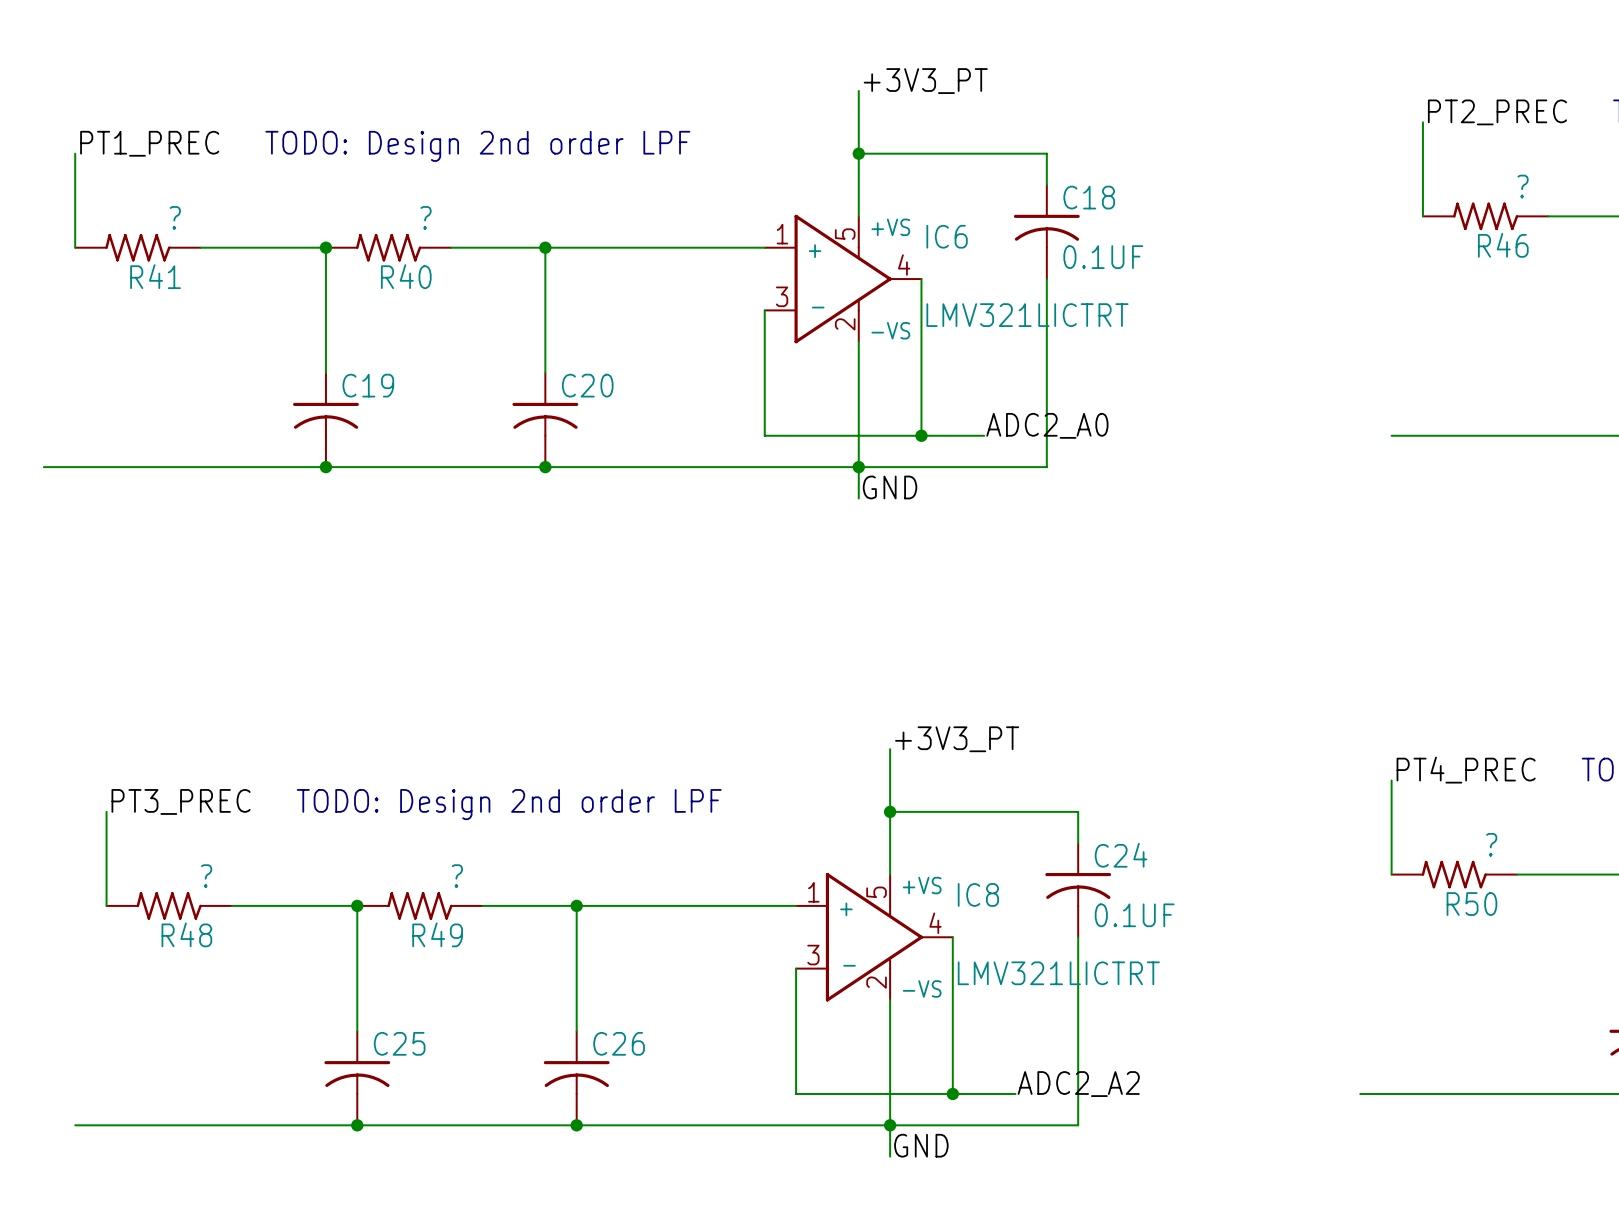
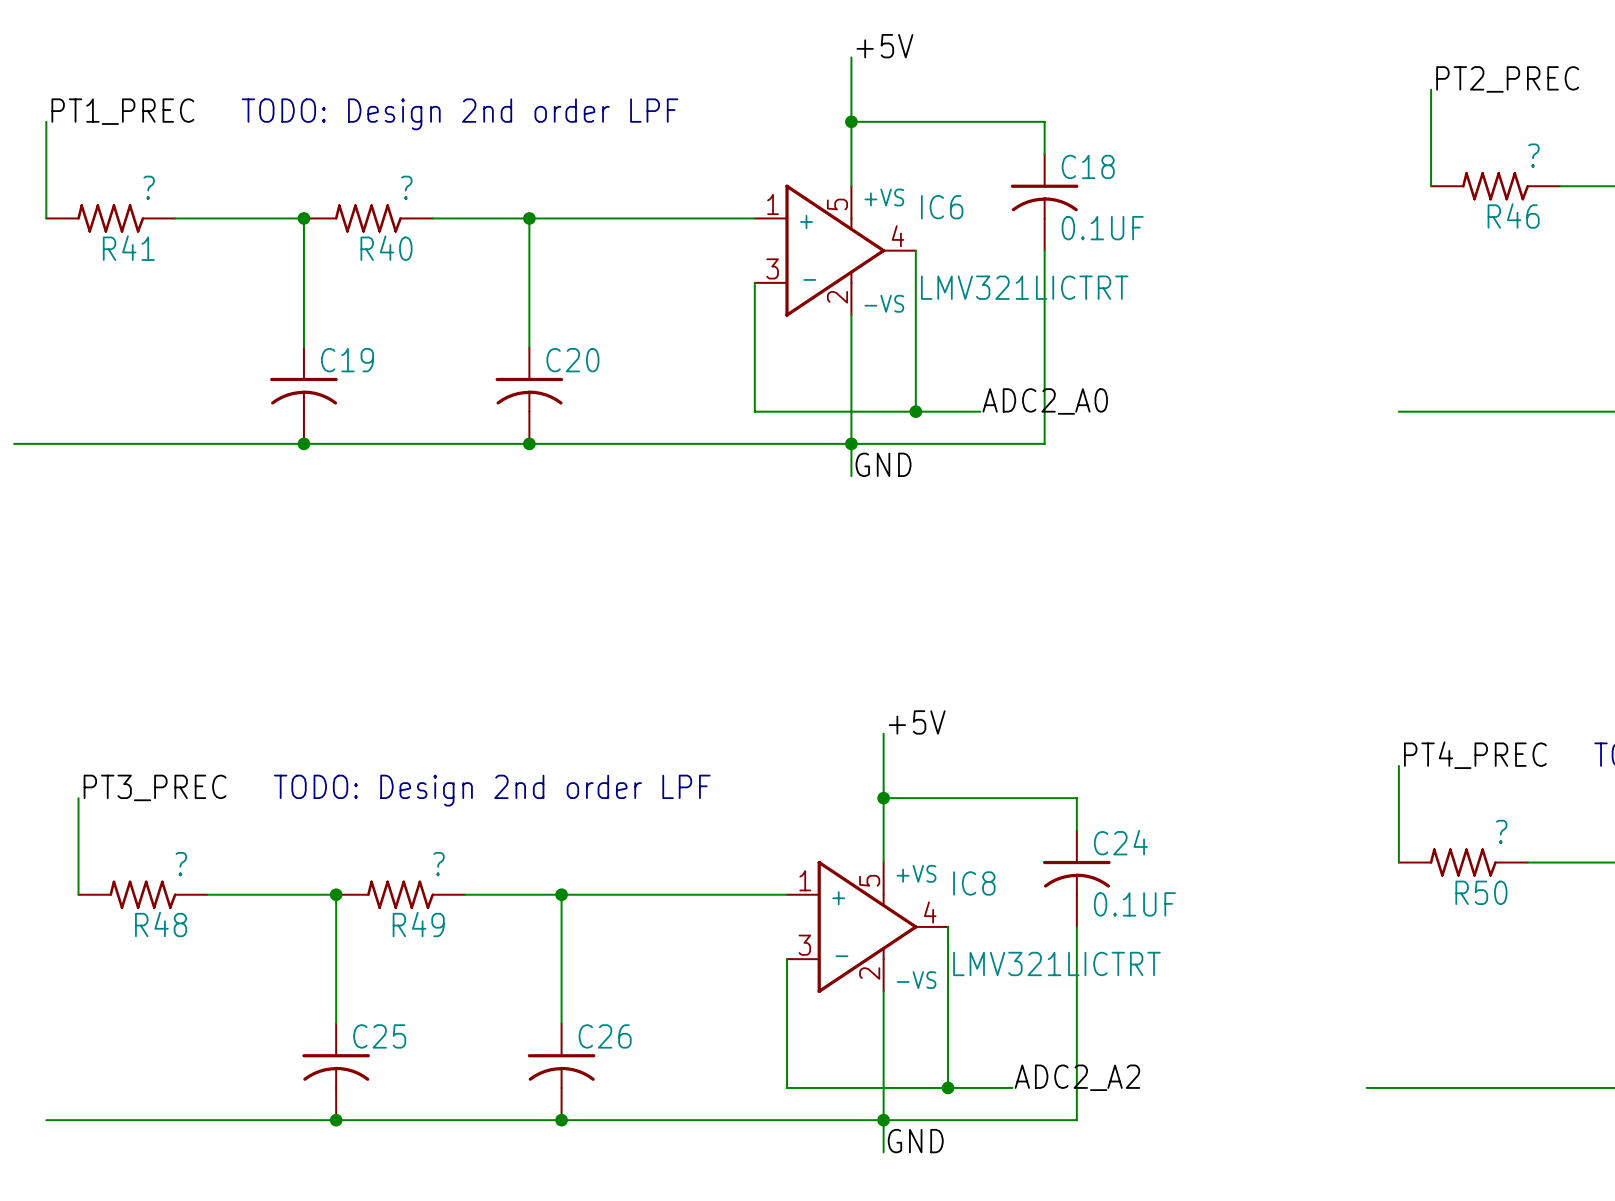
label: +3V3_PT (925, 81) -> +5V (884, 46)
label: +3V3_PT (957, 739) -> +5V (917, 722)

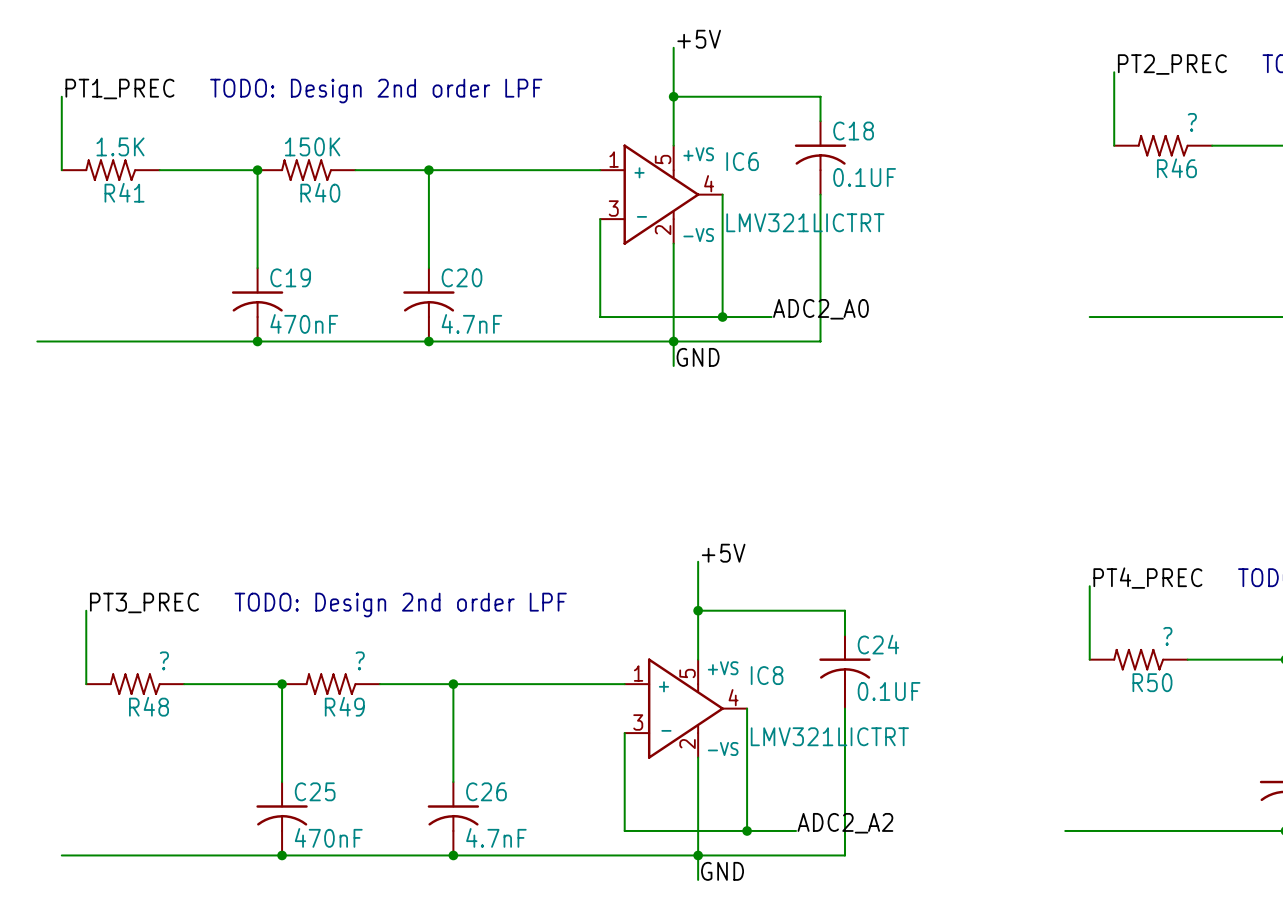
R41 value: ? (149, 187) -> 1.5K (120, 146)
R40 value: ? (406, 187) -> 150K (312, 146)
C19 value: none -> 470nF (304, 323)
C20 value: none -> 4.7nF (471, 323)
C25 value: none -> 470nF (328, 837)
C26 value: none -> 4.7nF (496, 837)

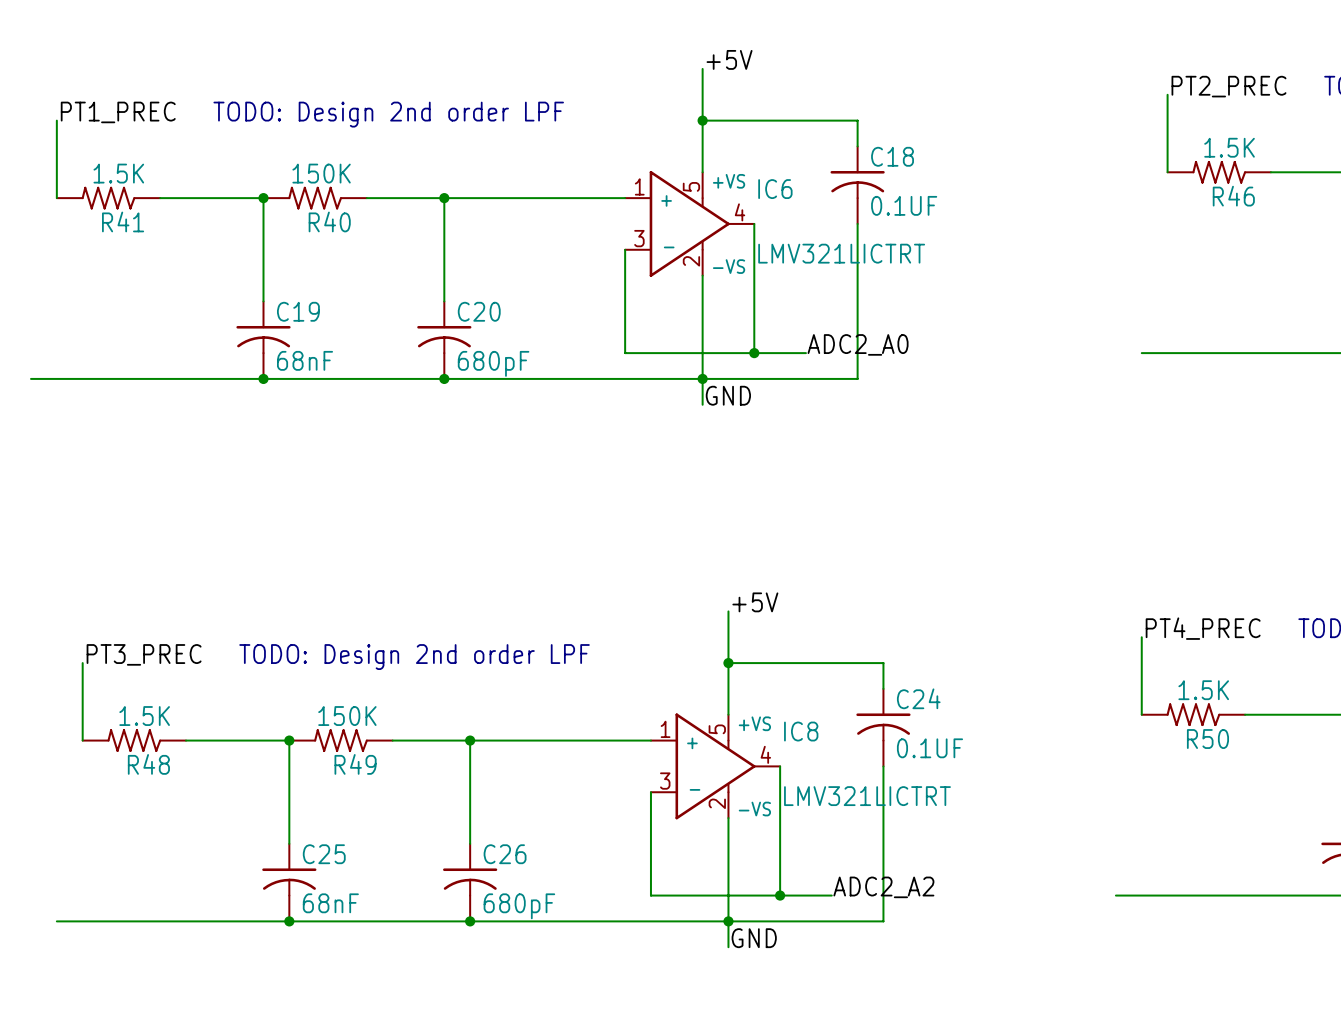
R46 value: ? (1192, 122) -> 1.5K (1229, 147)
C19 value: 470nF (304, 323) -> 68nF (305, 360)
C20 value: 4.7nF (471, 323) -> 680pF (493, 363)
R50 value: ? (1167, 636) -> 1.5K (1203, 690)
R48 value: ? (164, 660) -> 1.5K (144, 716)
R49 value: ? (360, 660) -> 150K (347, 716)
C25 value: 470nF (328, 837) -> 68nF (330, 903)
C26 value: 4.7nF (496, 837) -> 680pF (519, 906)

